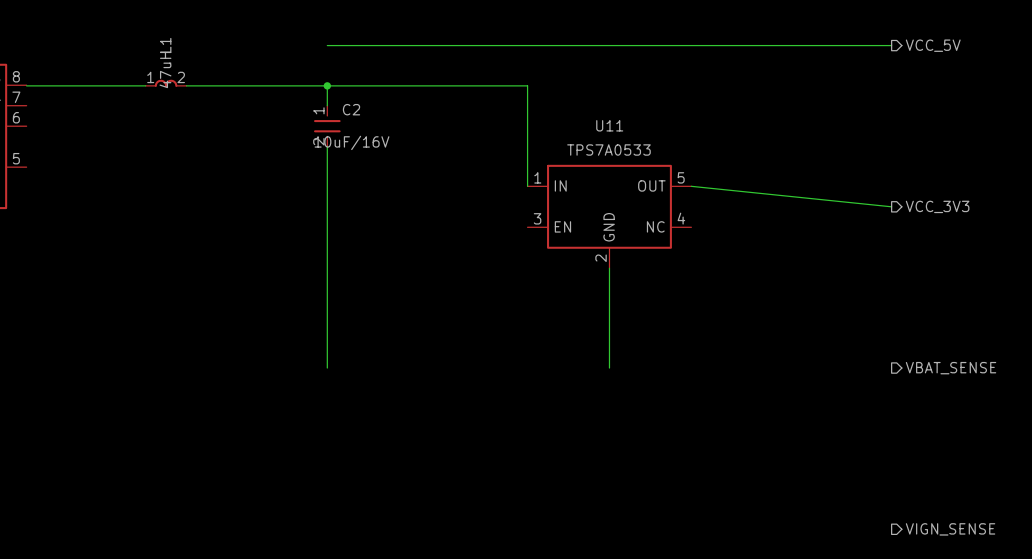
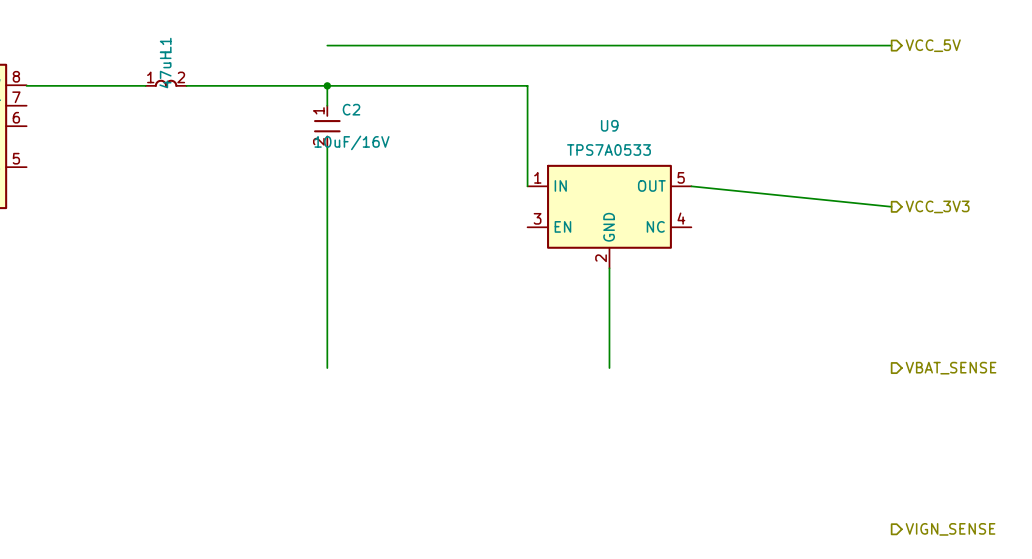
U11 name: U11 (609, 125) -> U9 (609, 125)

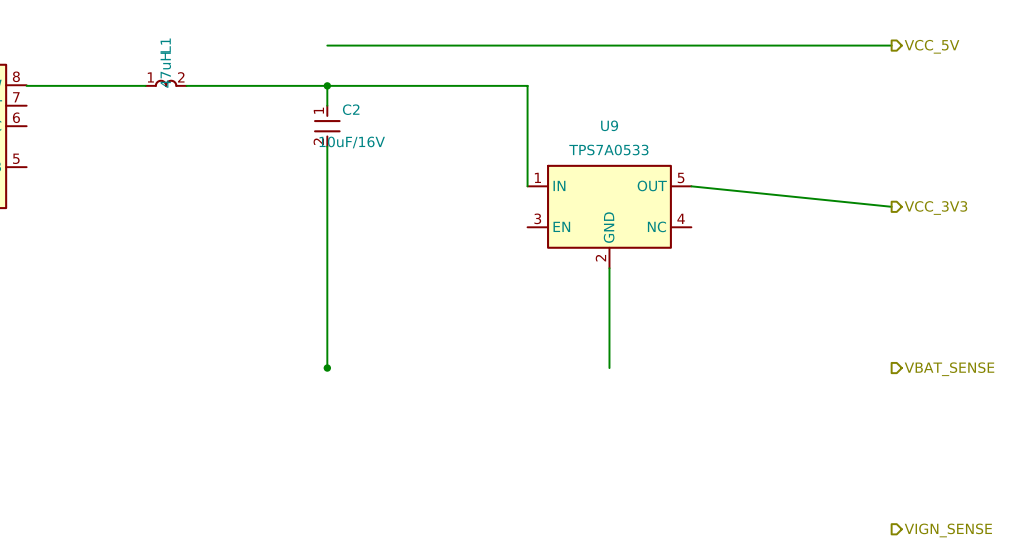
junction: none -> (327, 368)

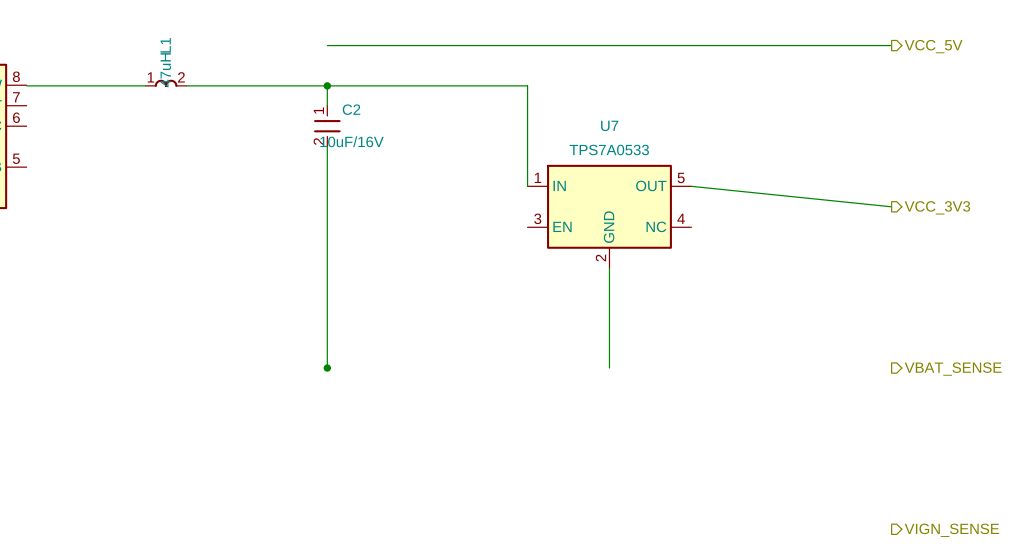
U9 name: U9 (609, 125) -> U7 (609, 125)

